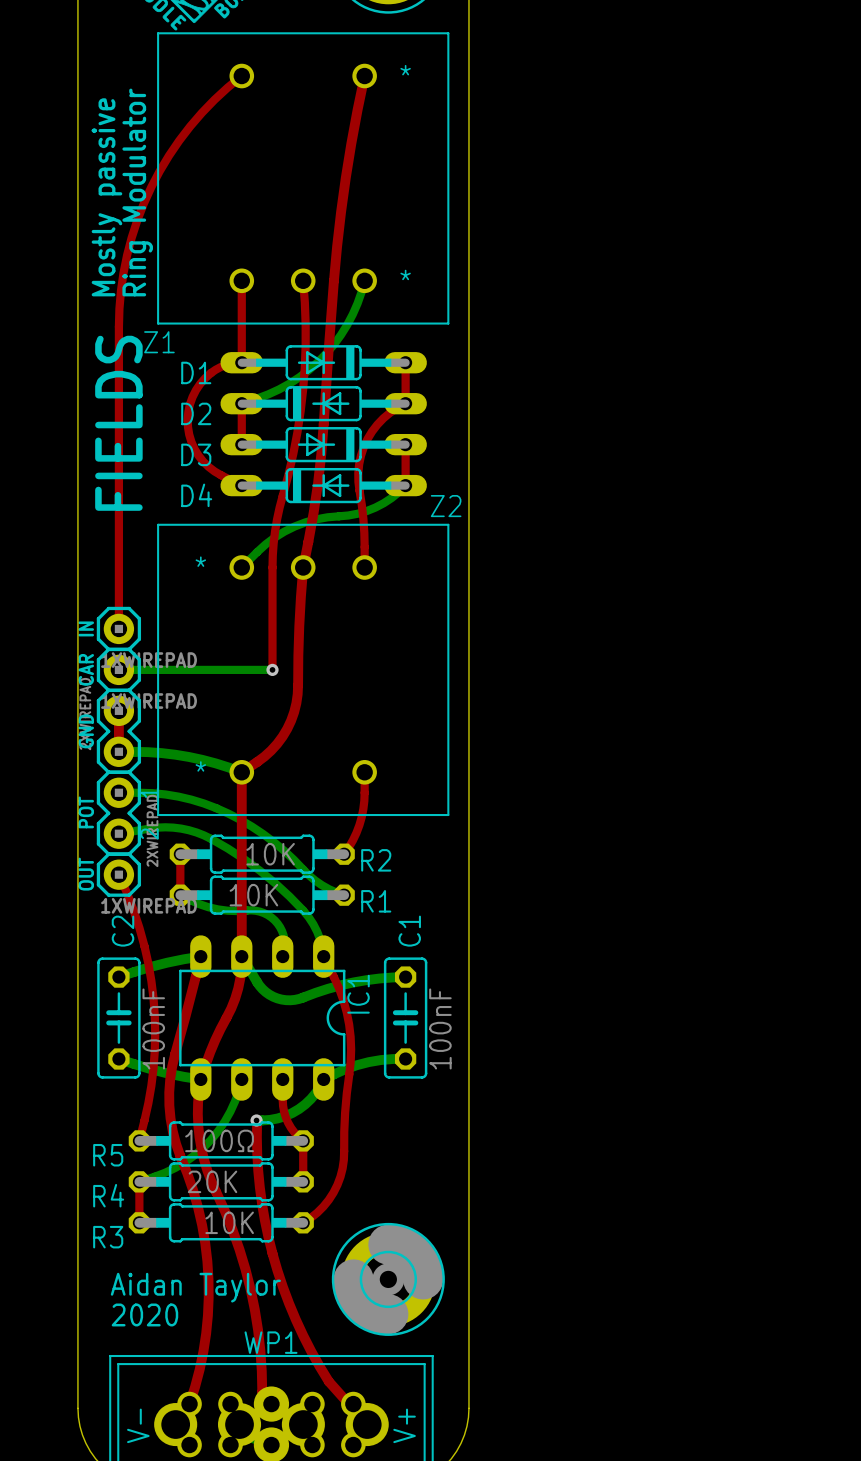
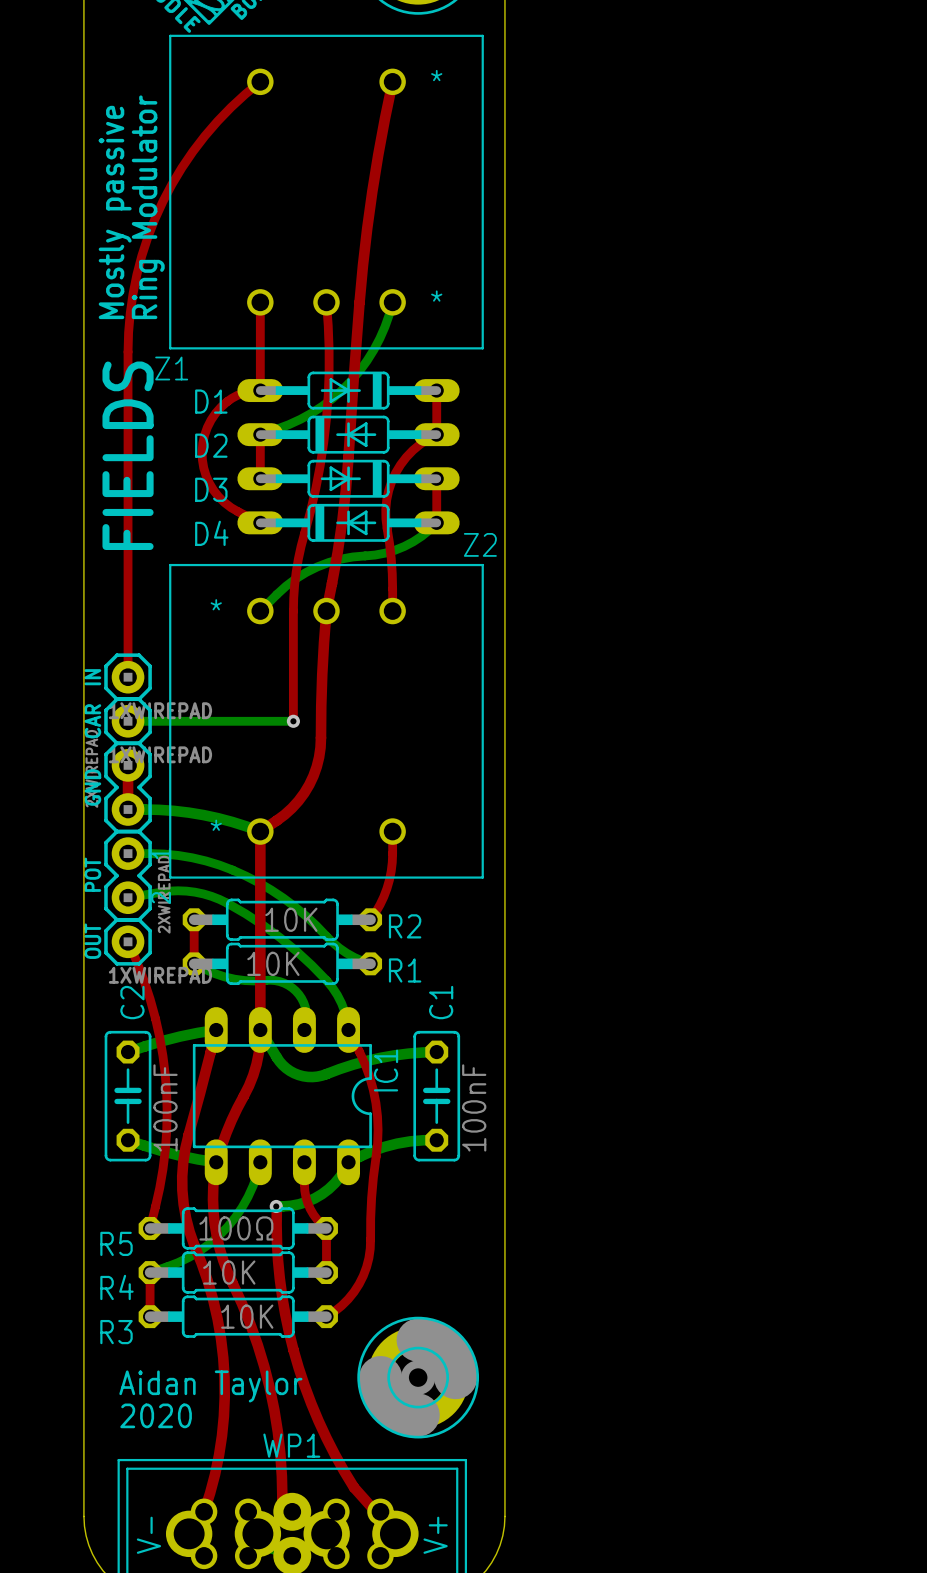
R4 value: 20K (212, 1181) -> 10K (229, 1272)

